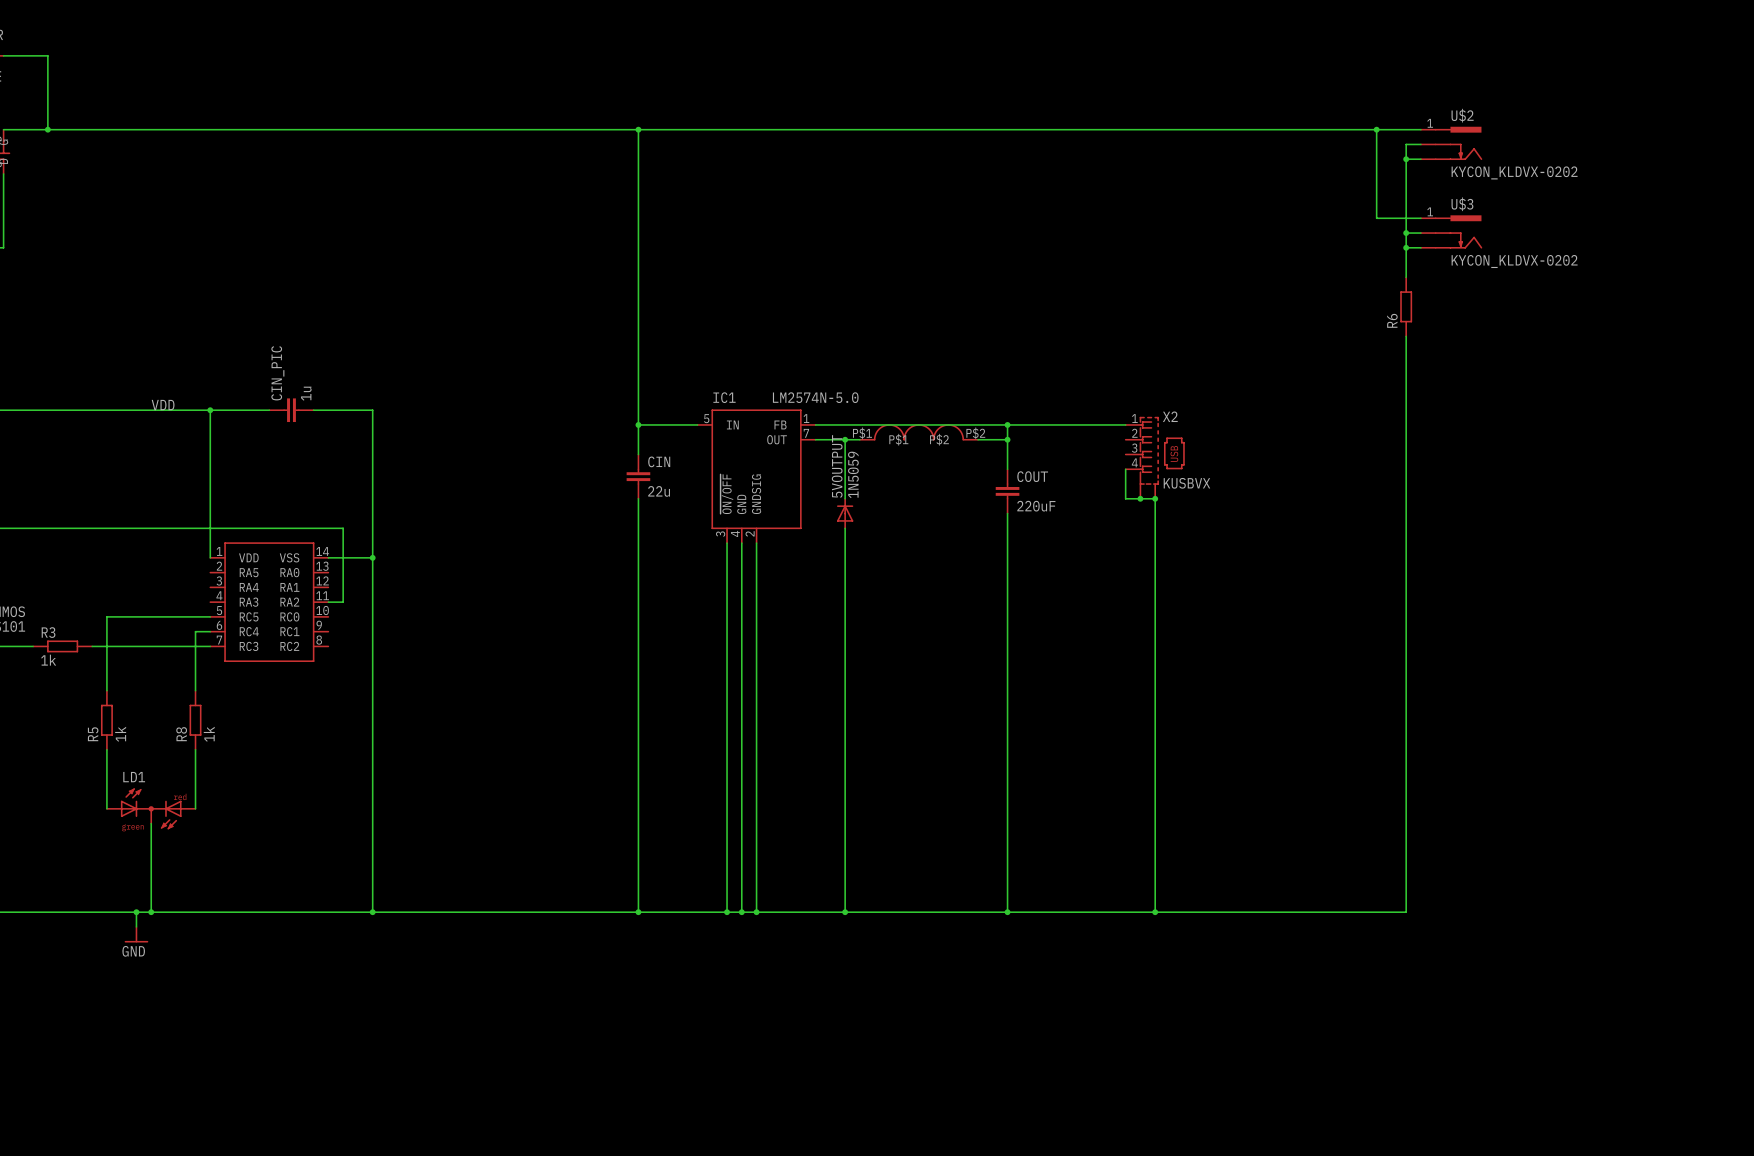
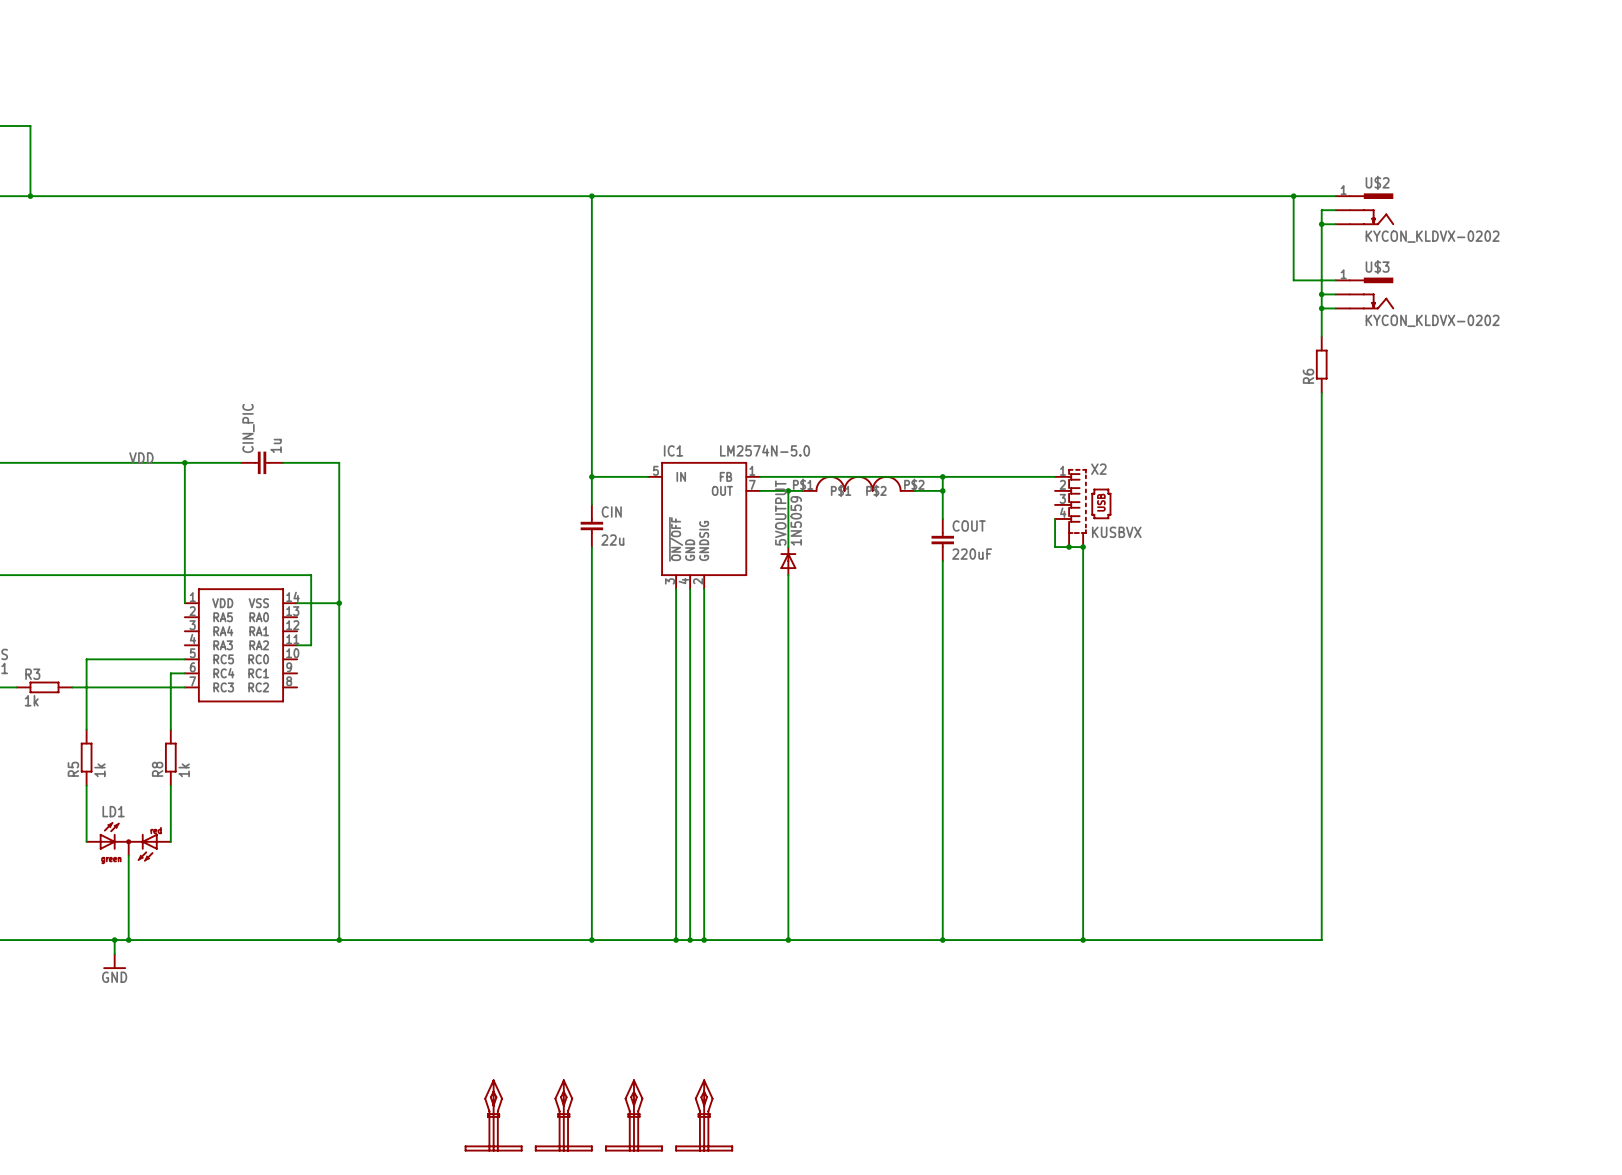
part: none -> (493, 1115)
part: none -> (563, 1115)
part: none -> (633, 1115)
part: none -> (704, 1115)

